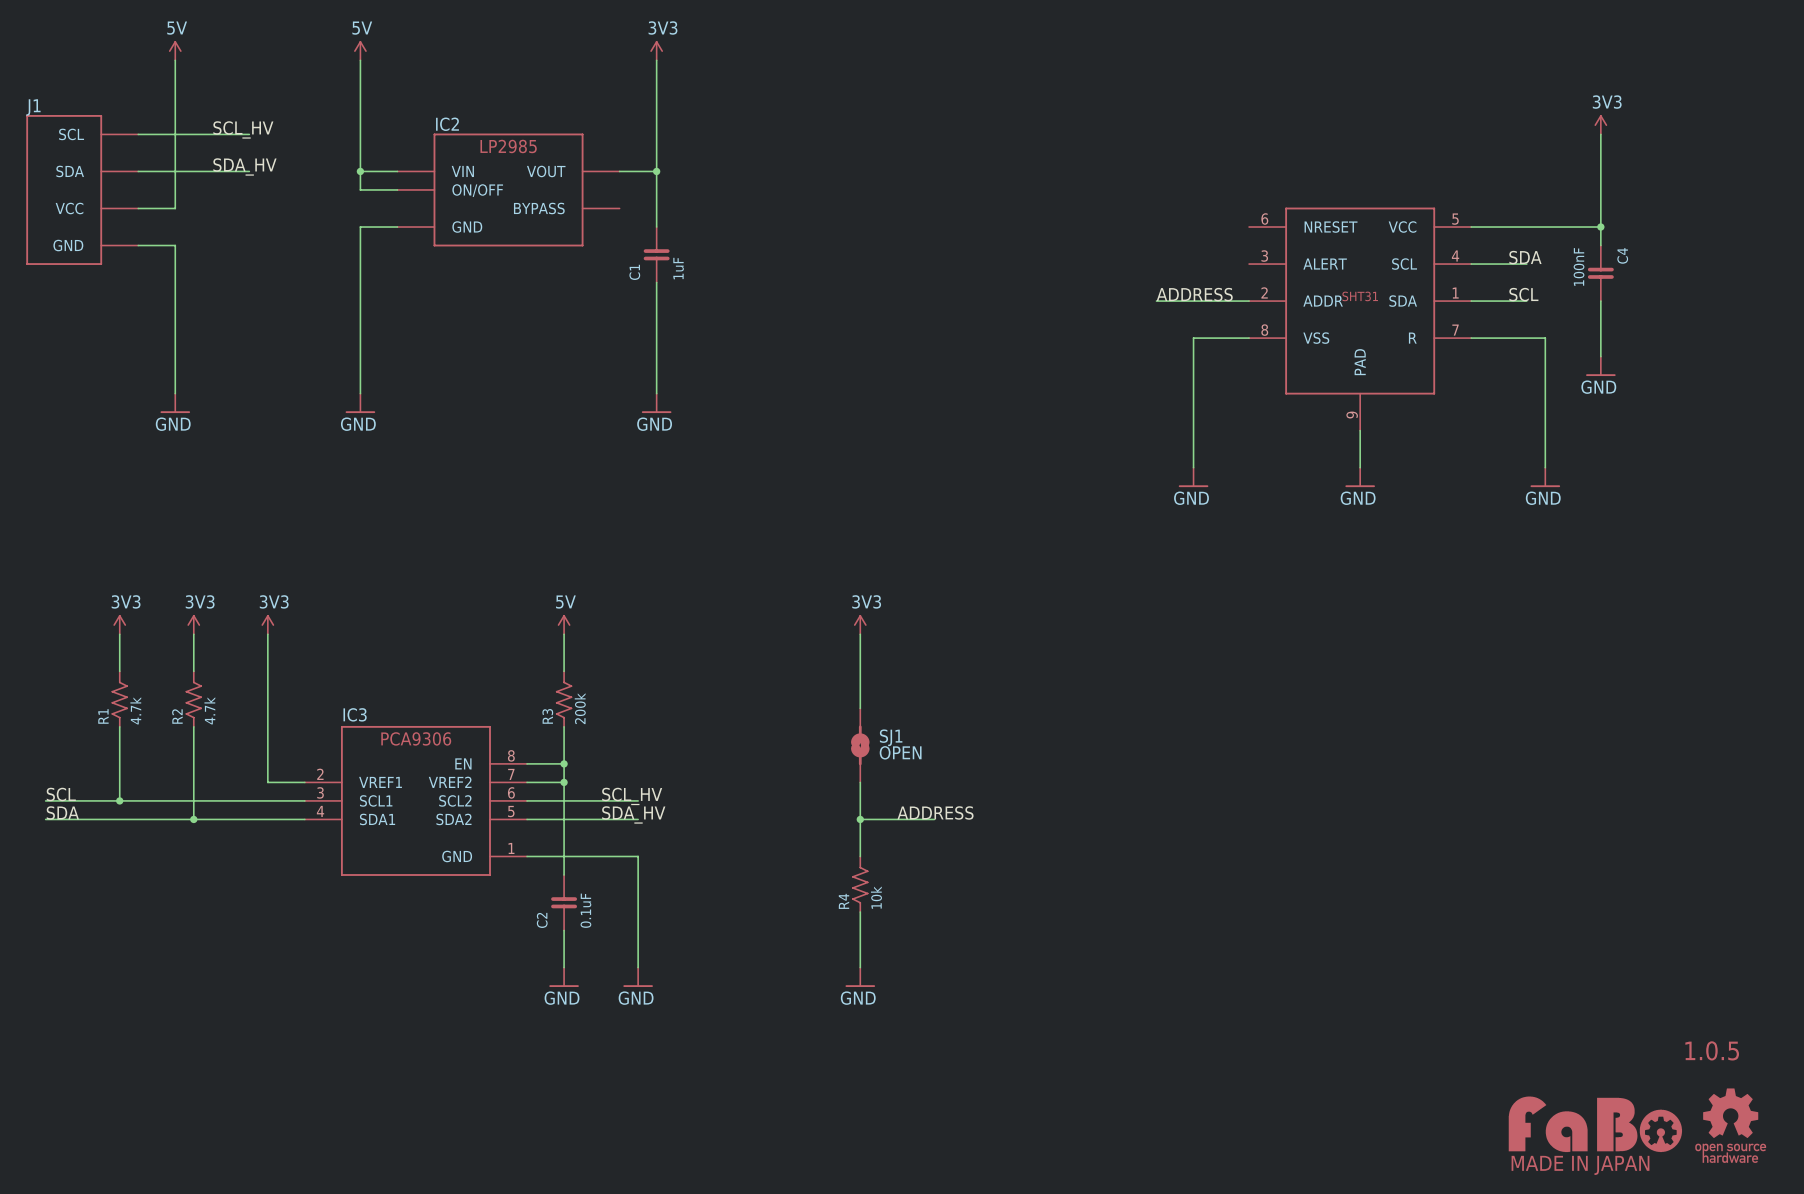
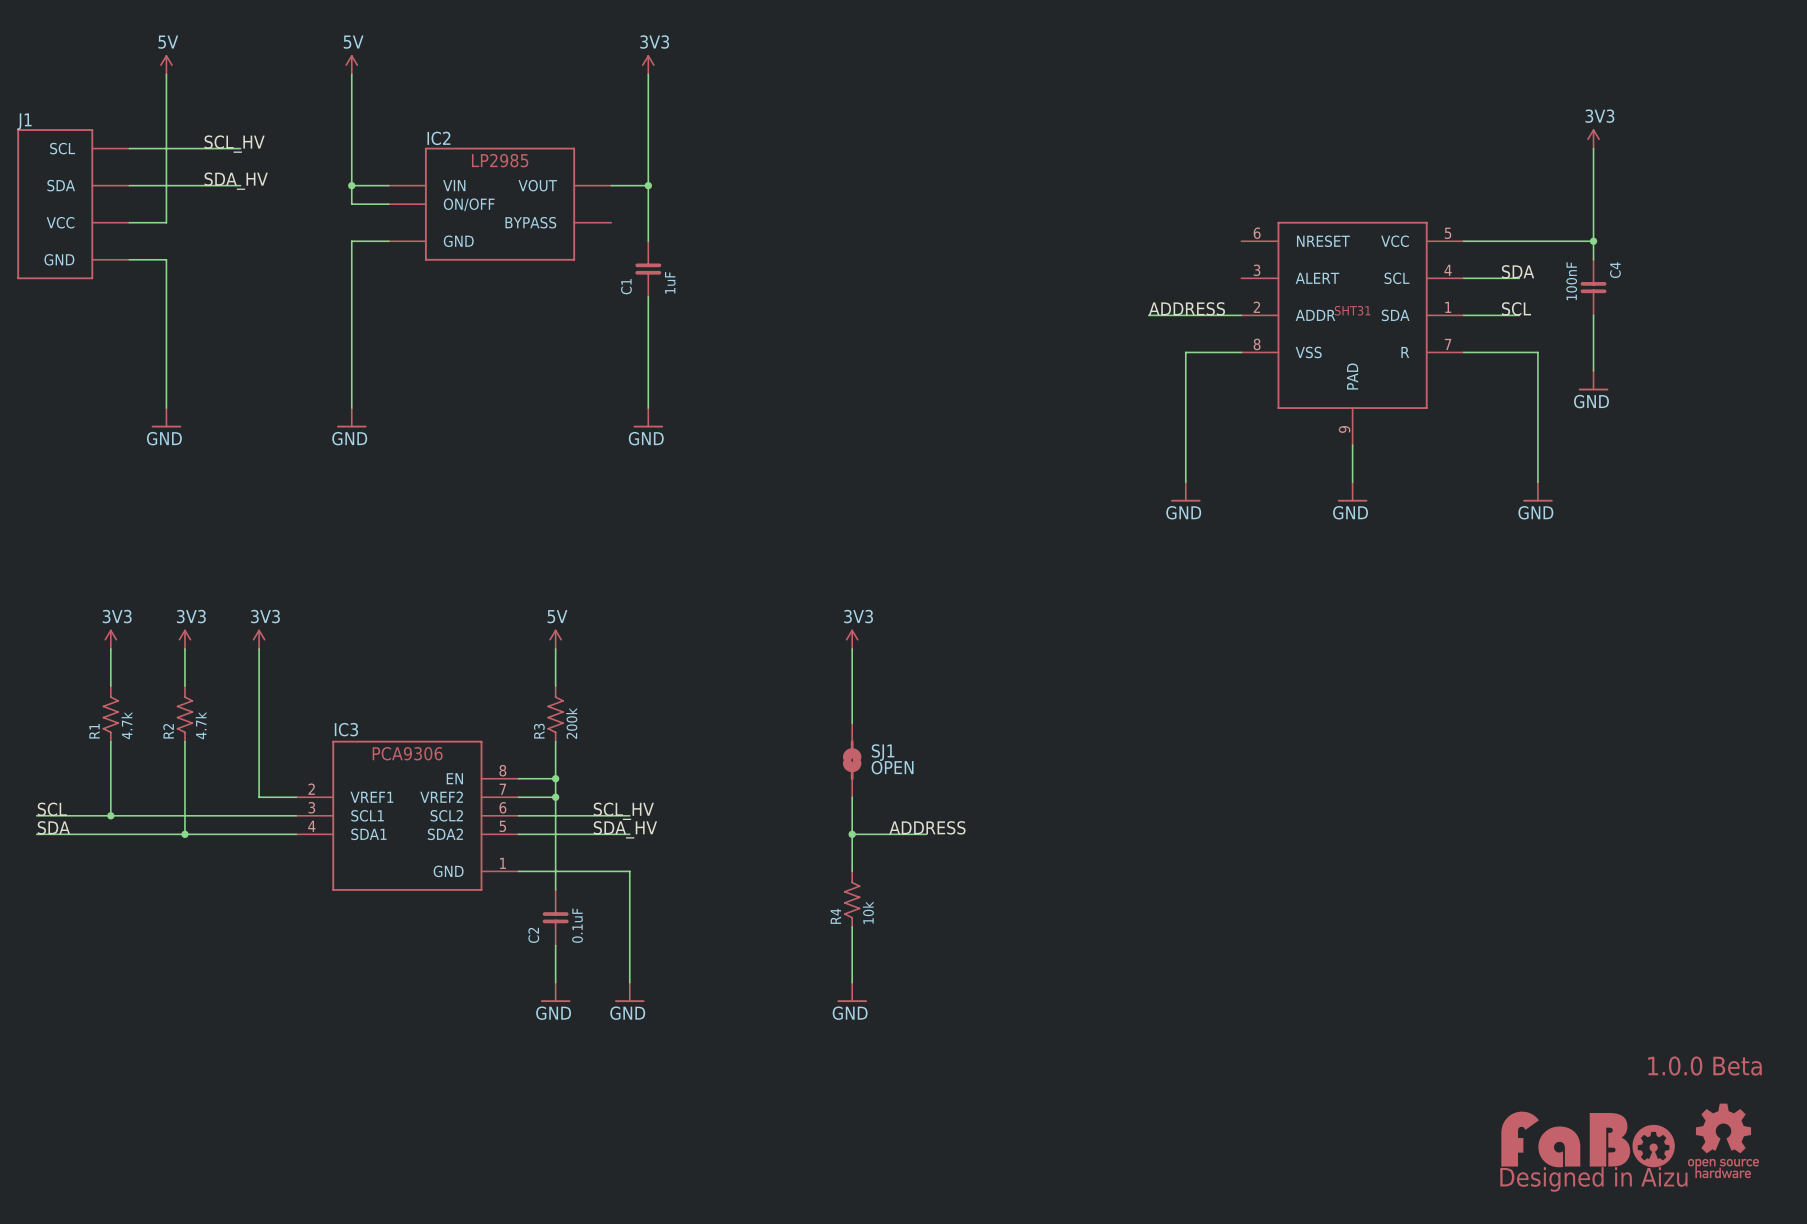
text: 1.0.5 (1712, 1050) -> 1.0.0 Beta (1704, 1066)
part text: none -> Designed in Aizu (1593, 1179)
part text: MADE IN JAPAN (1580, 1165) -> none

